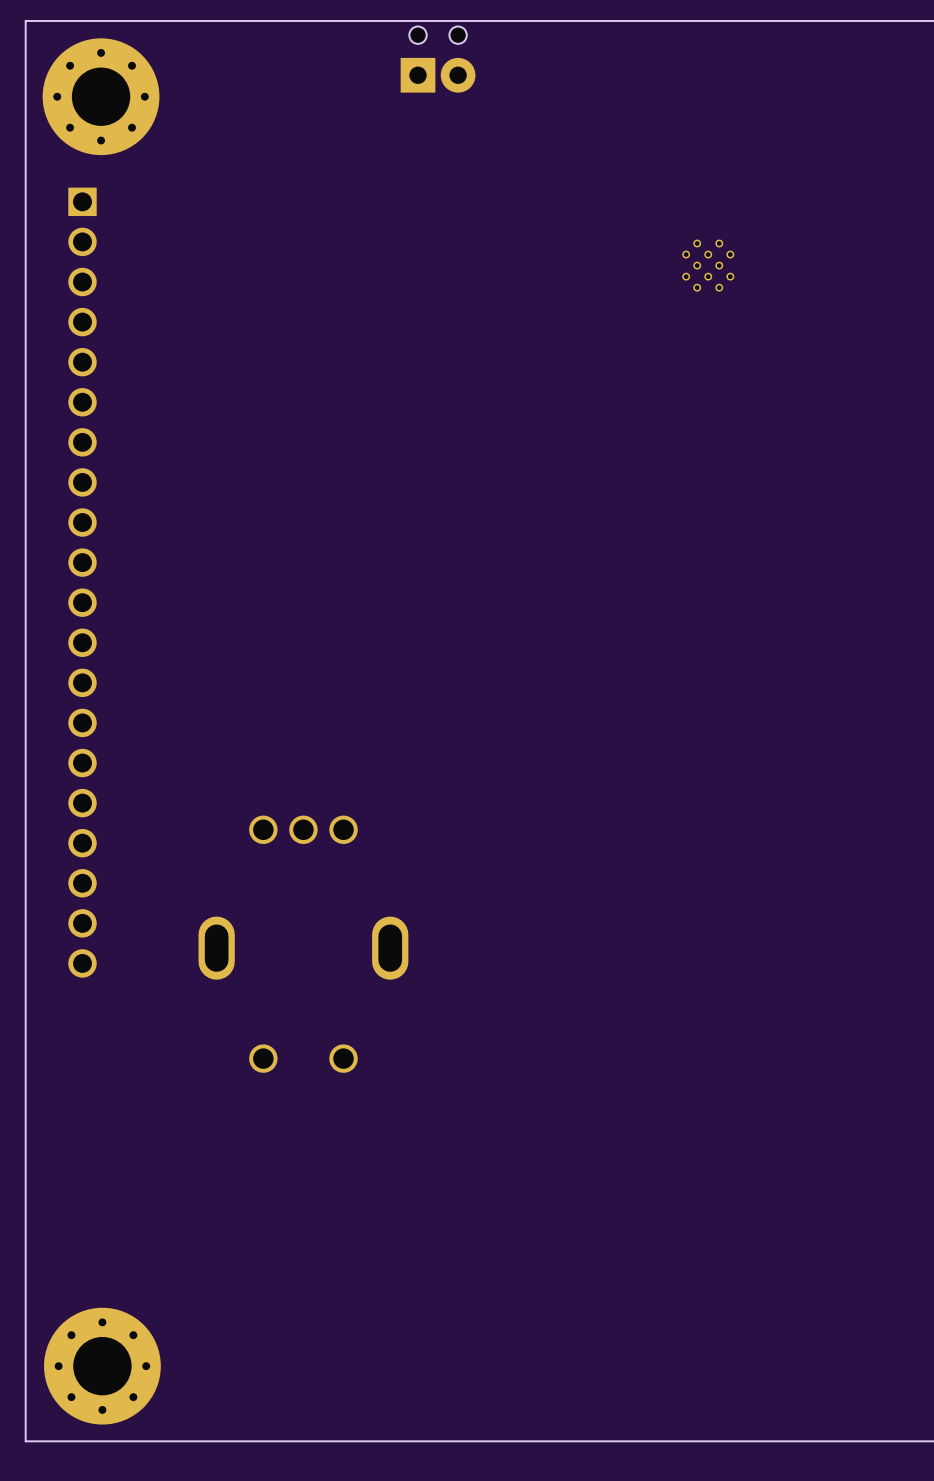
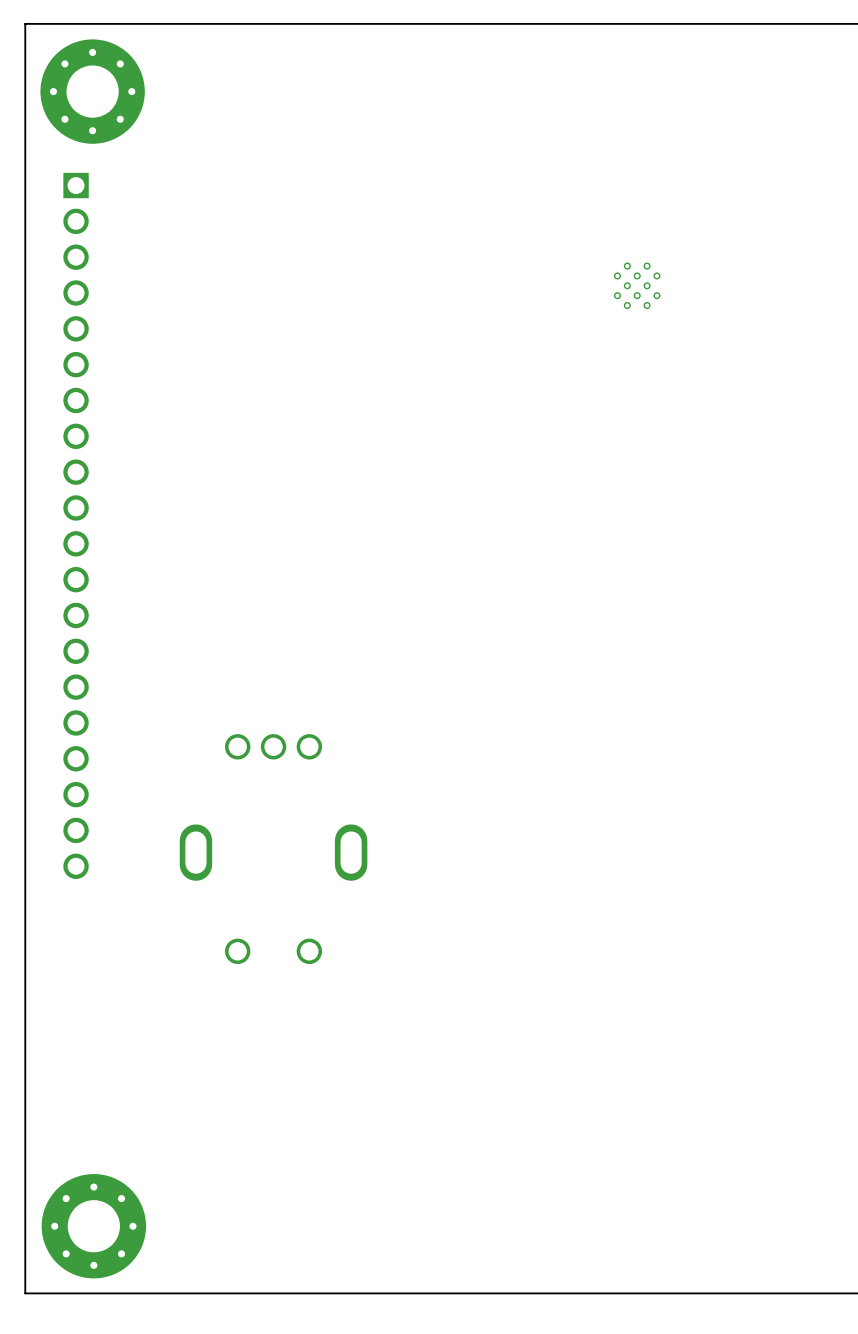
part: (438, 59) -> none
part position: (708, 265) -> (637, 285)

